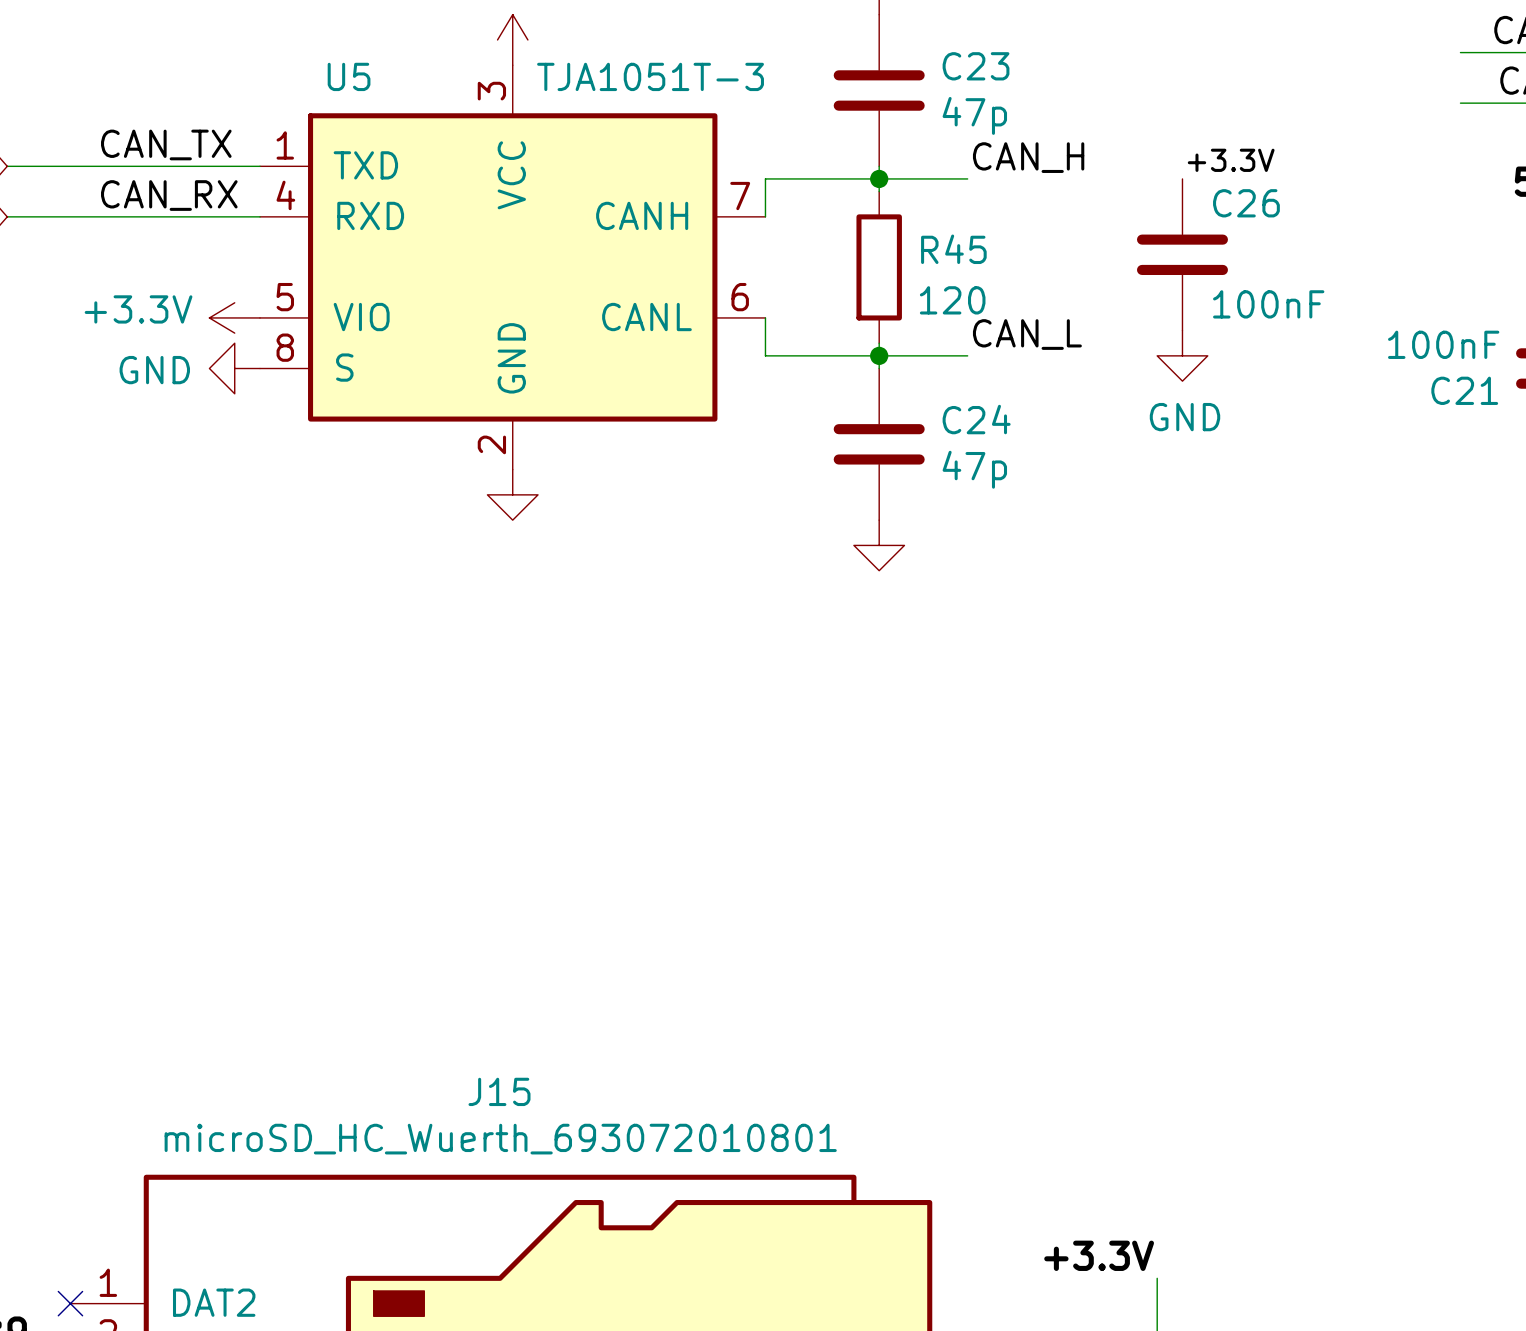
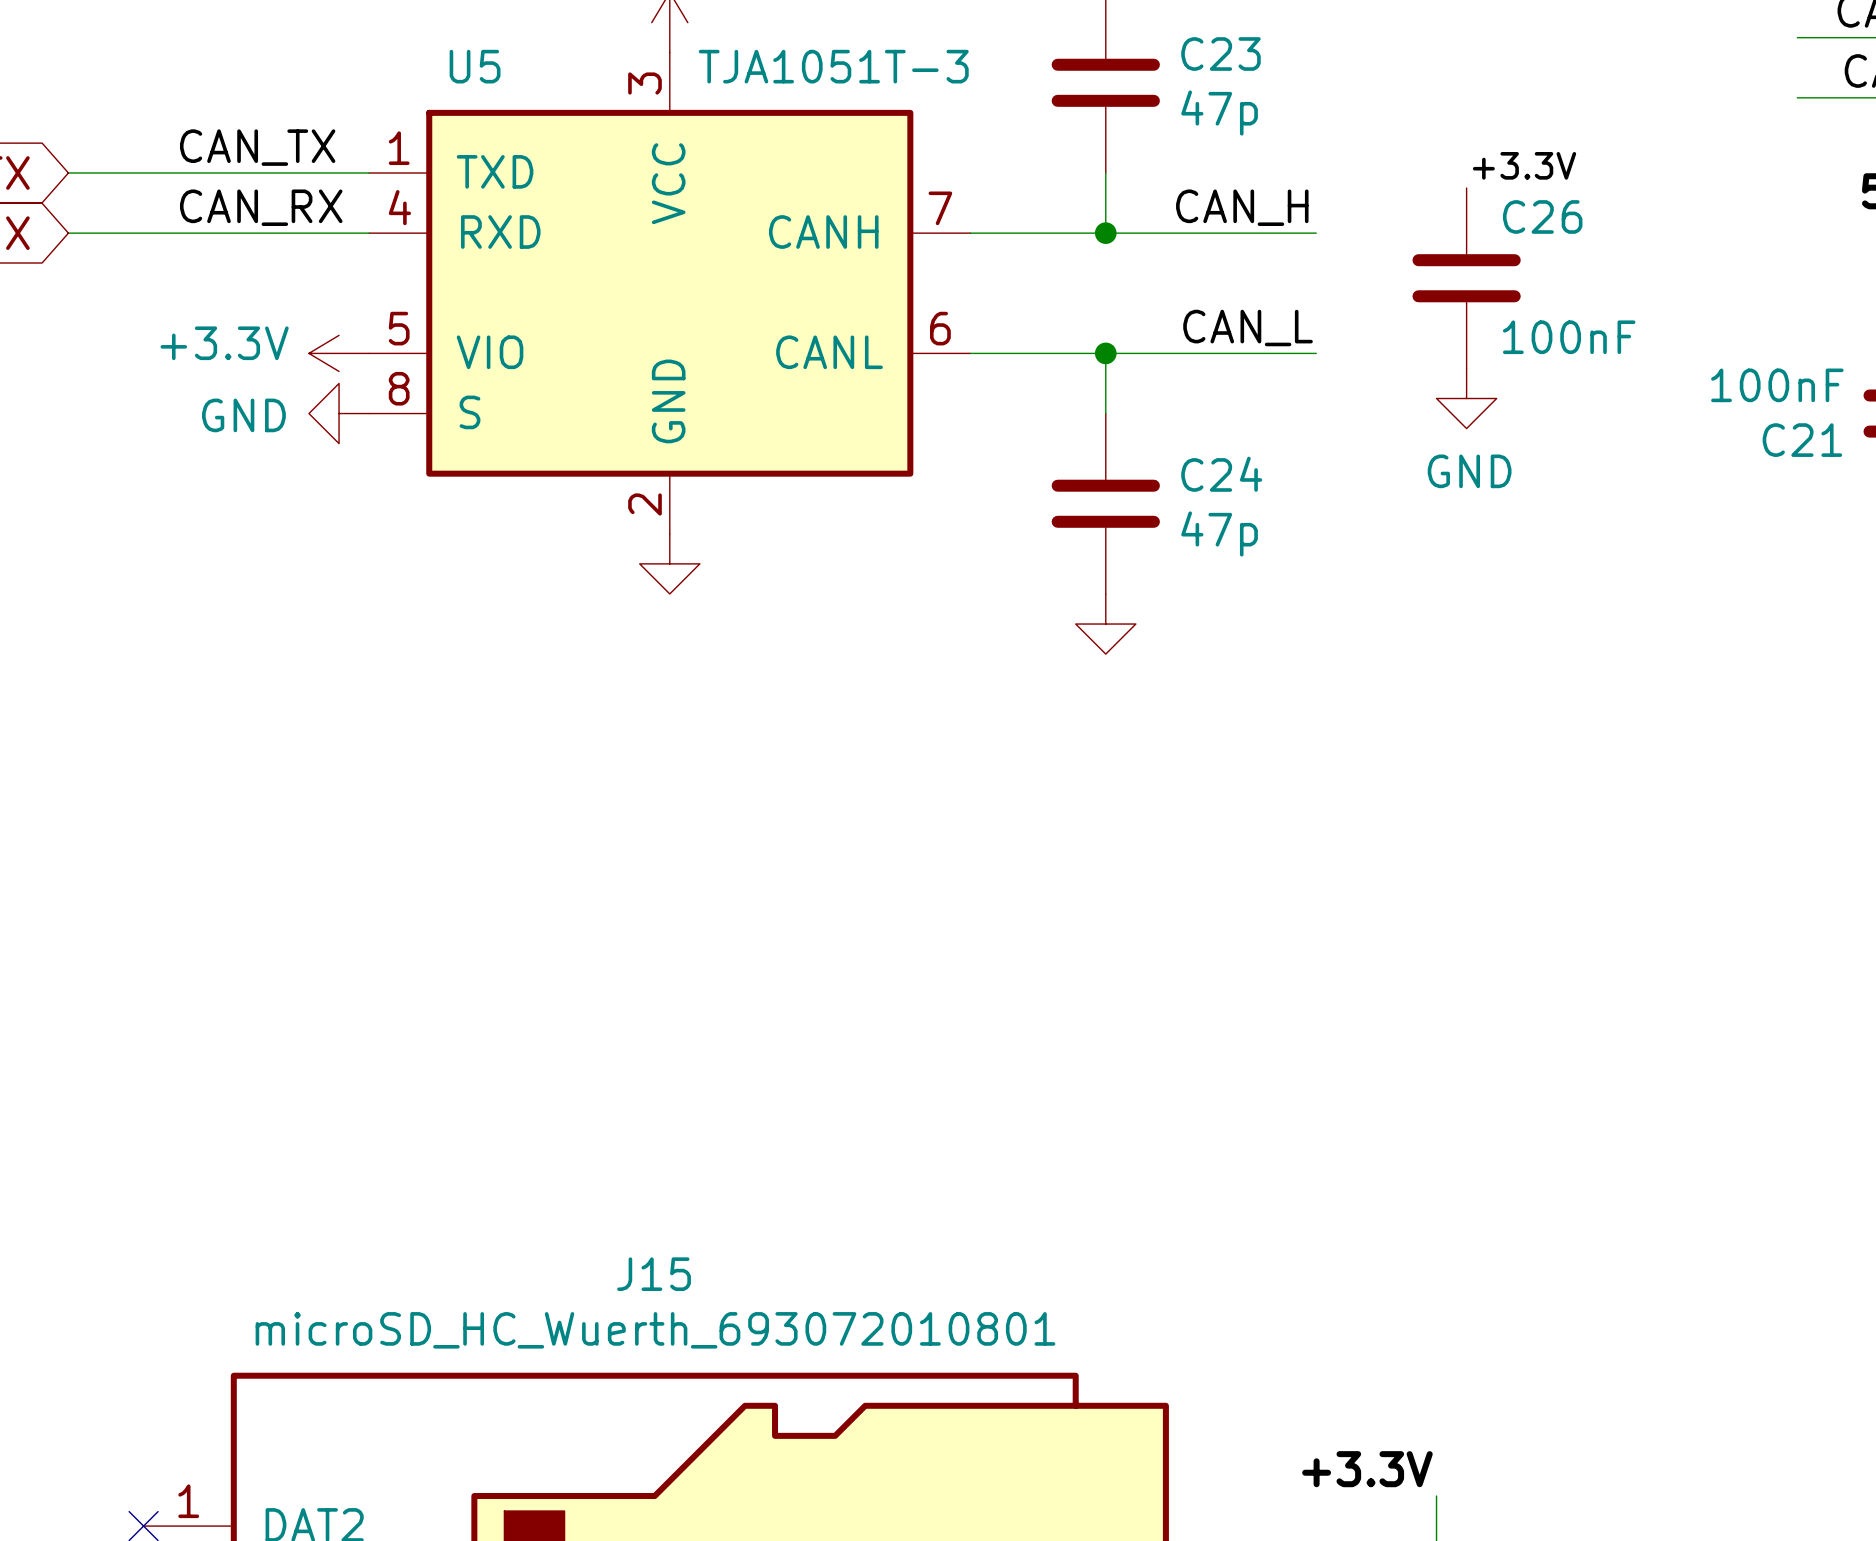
label position: CAN_H (1028, 157) -> CAN_H (1242, 207)
junction position: (879, 178) -> (1105, 233)
wire: (967, 178) (765, 178) (765, 216) -> (1316, 233) (970, 233)
R45: 120 (879, 267) -> none
wire: (765, 317) (765, 355) (967, 355) -> (970, 353) (1316, 353)
label position: CAN_L (1027, 334) -> CAN_L (1248, 328)
junction position: (879, 355) -> (1105, 353)

